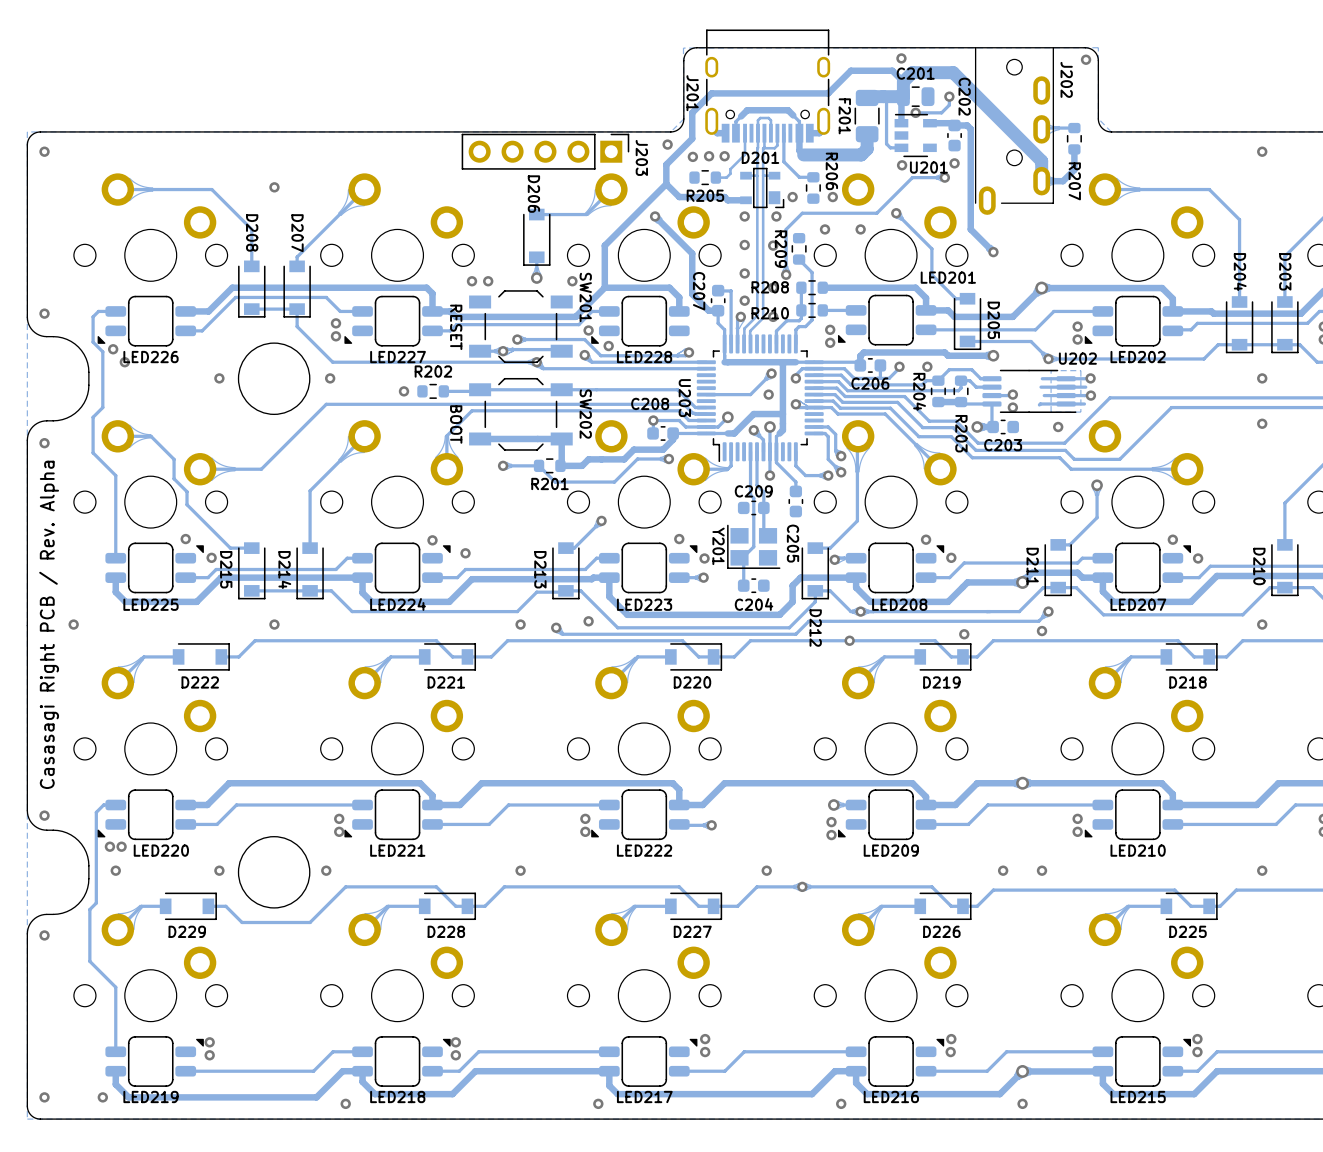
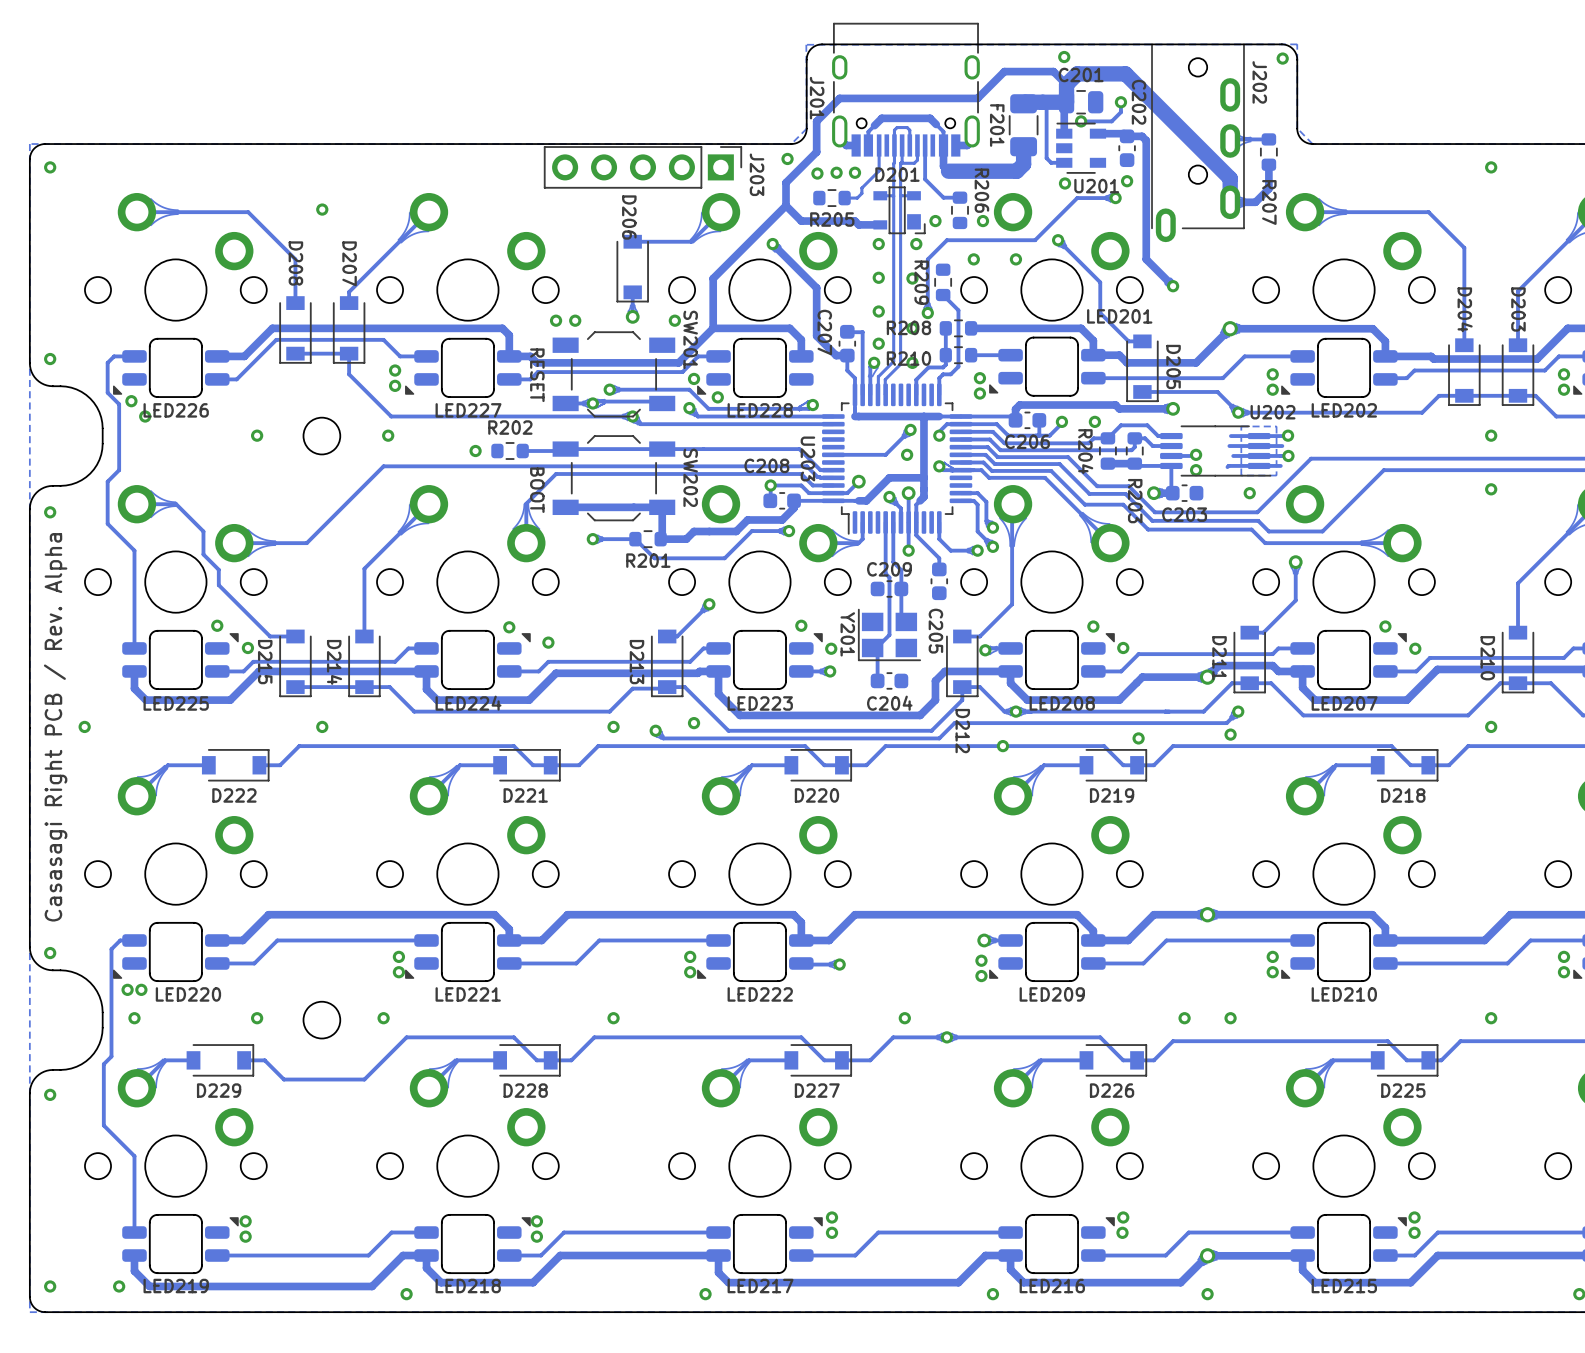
round board edge size: [237, 342, 311, 416] -> [302, 416, 342, 456]
round board edge size: [237, 836, 311, 909] -> [302, 1000, 342, 1040]

